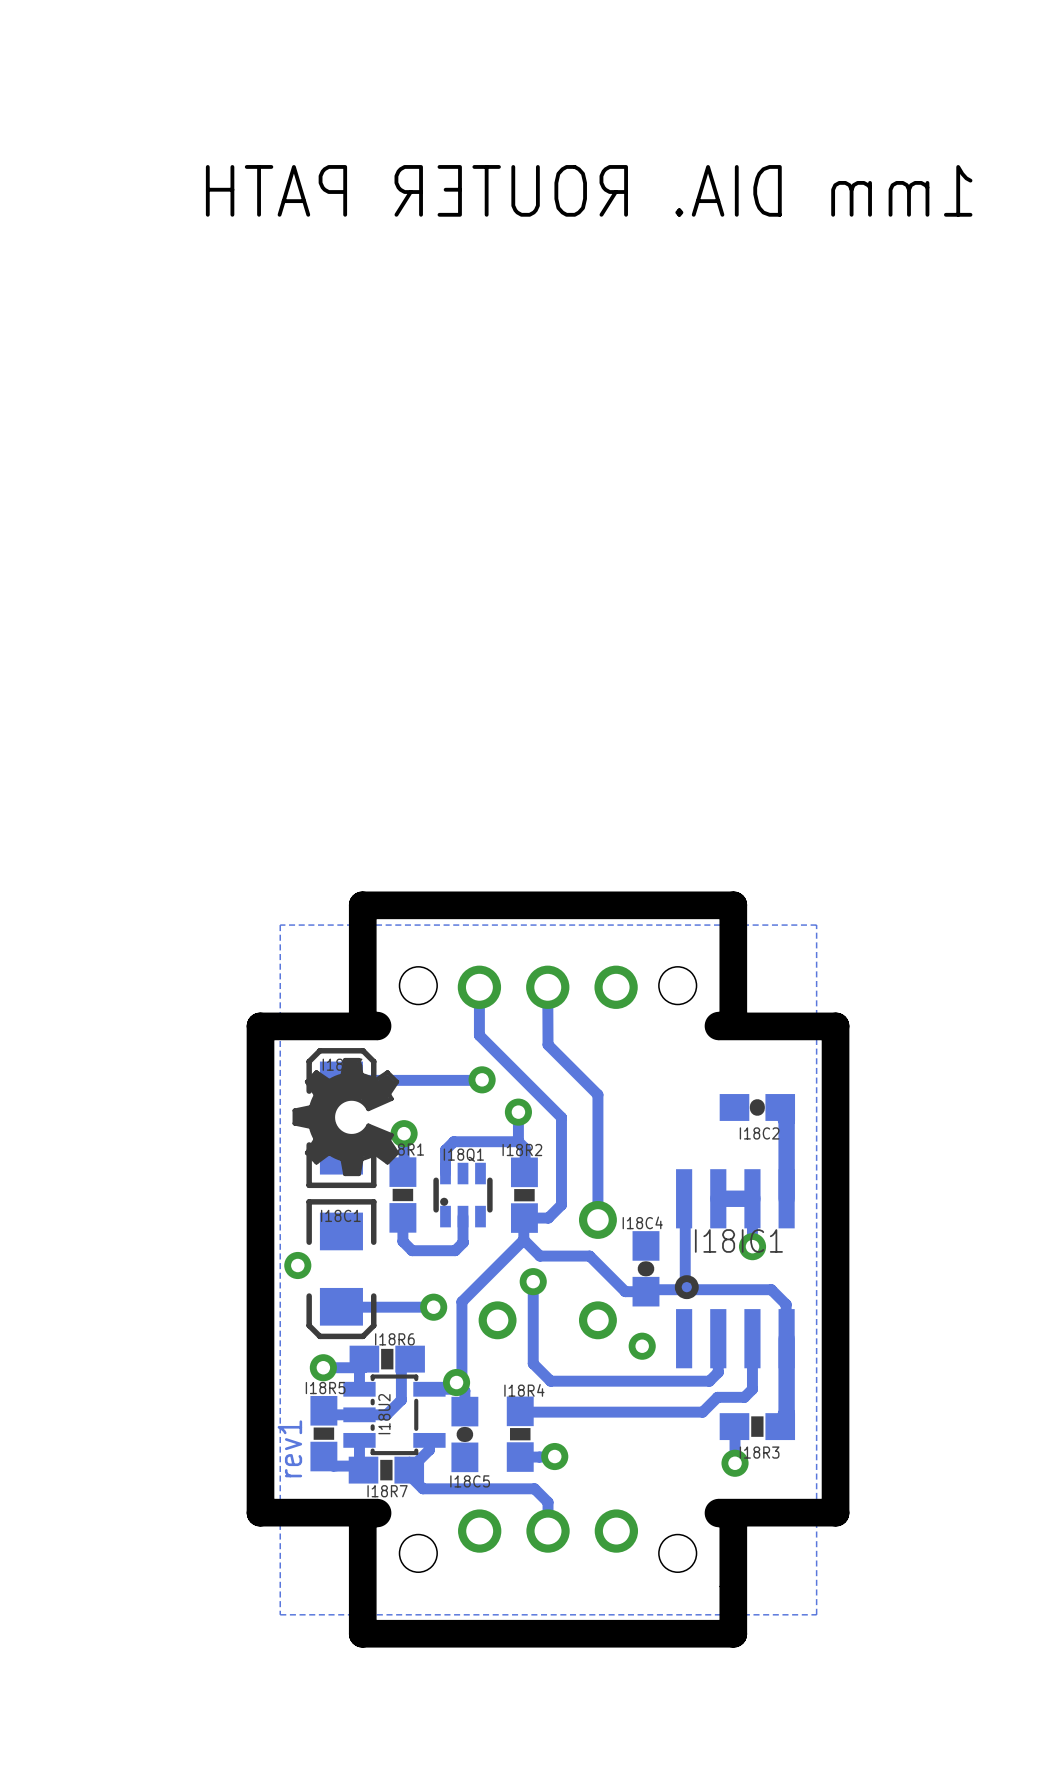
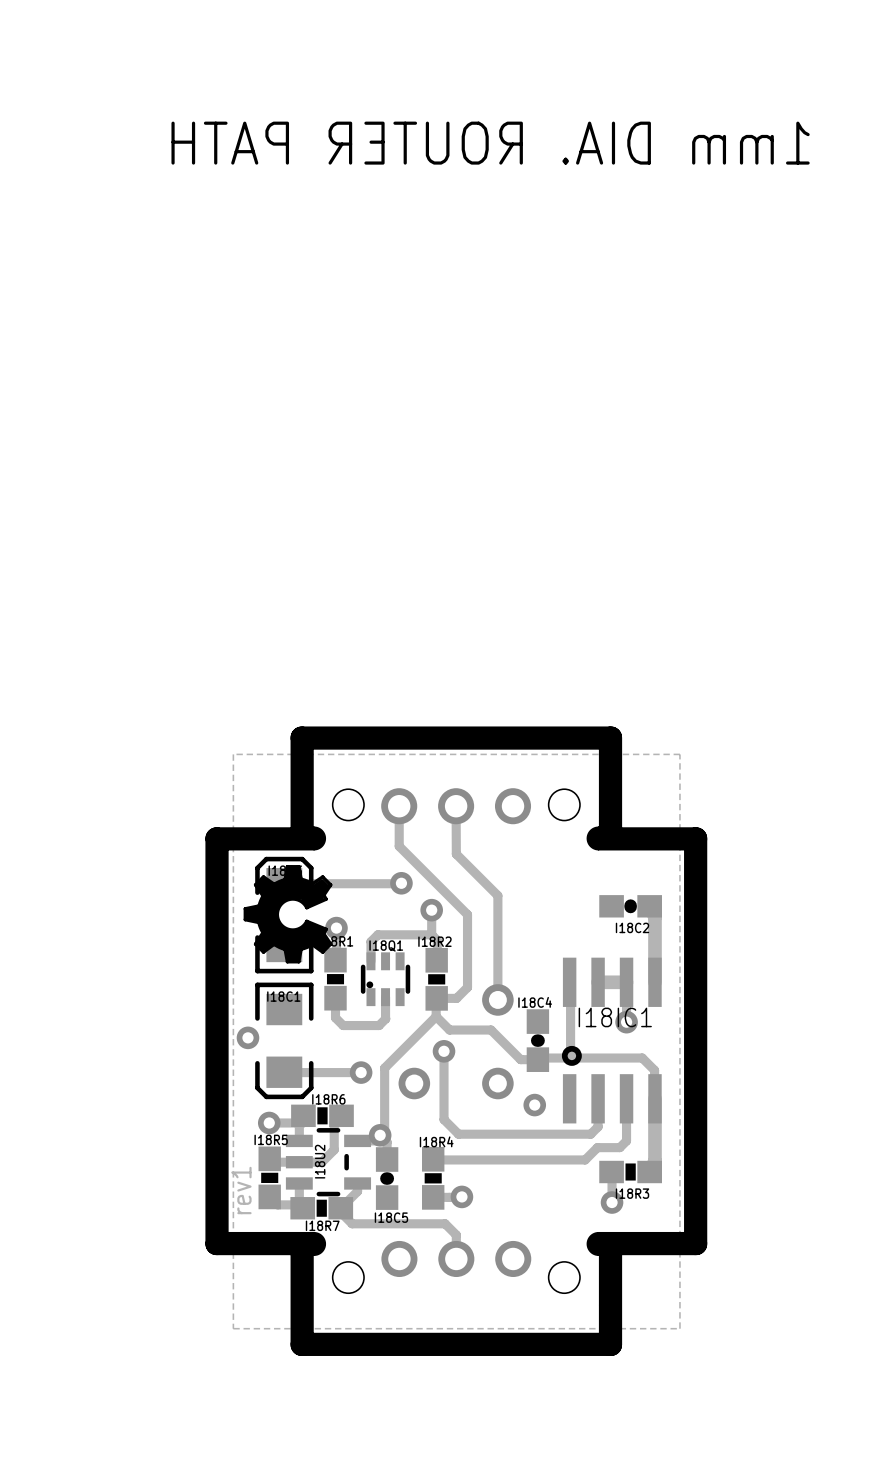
I18U2 footprint: [343, 1374, 446, 1456] -> [285, 1128, 372, 1197]

